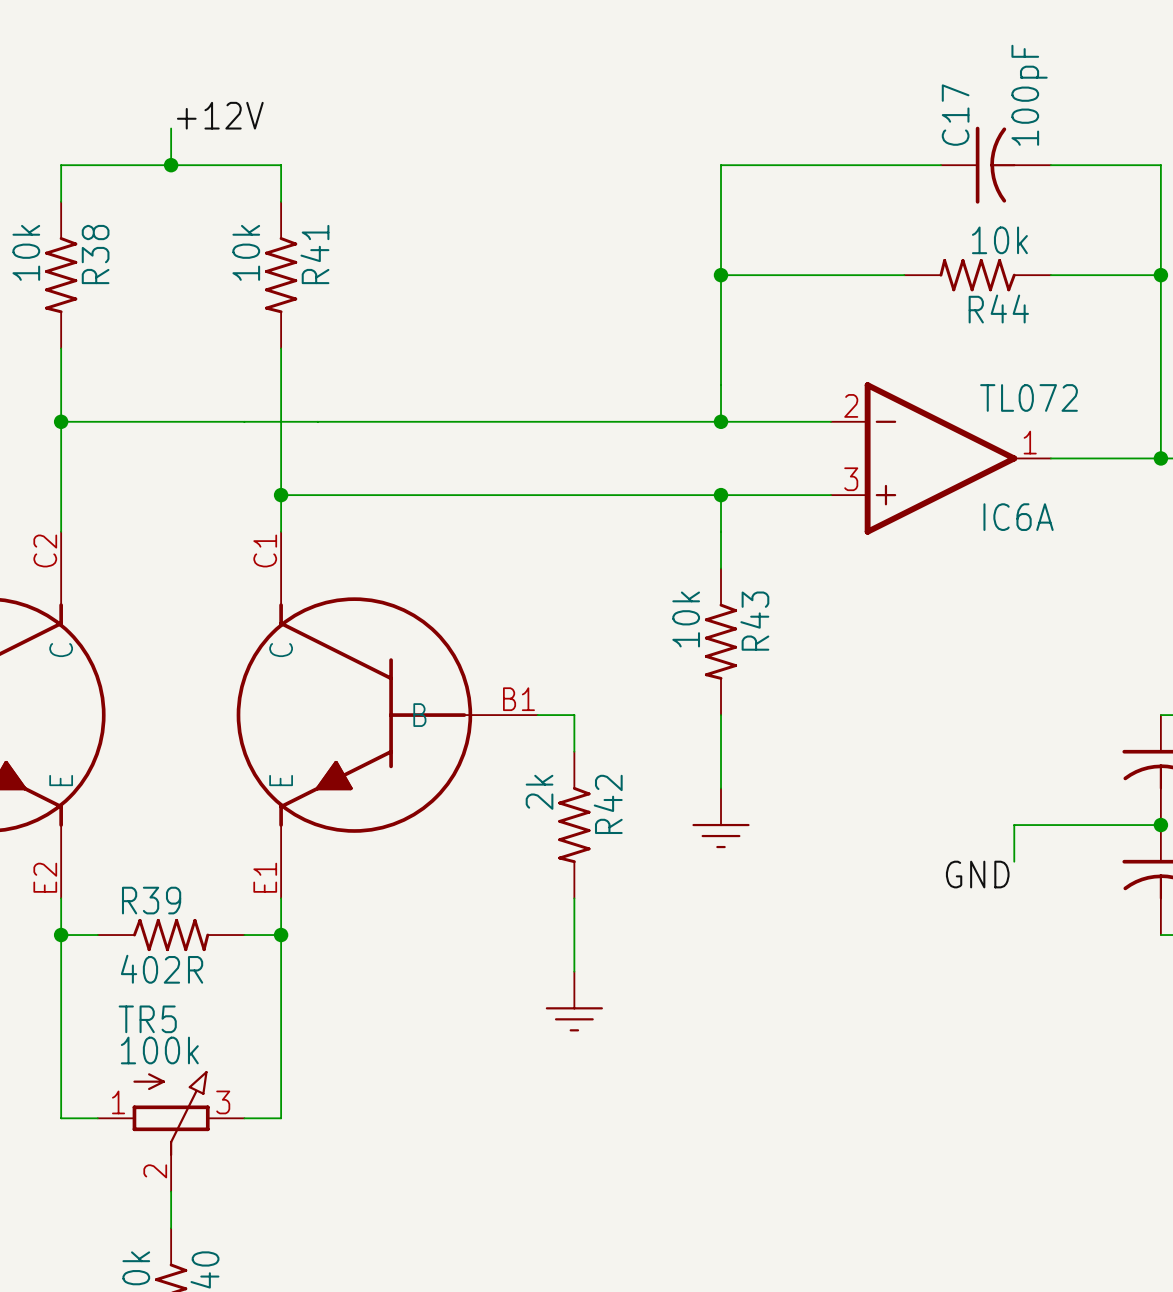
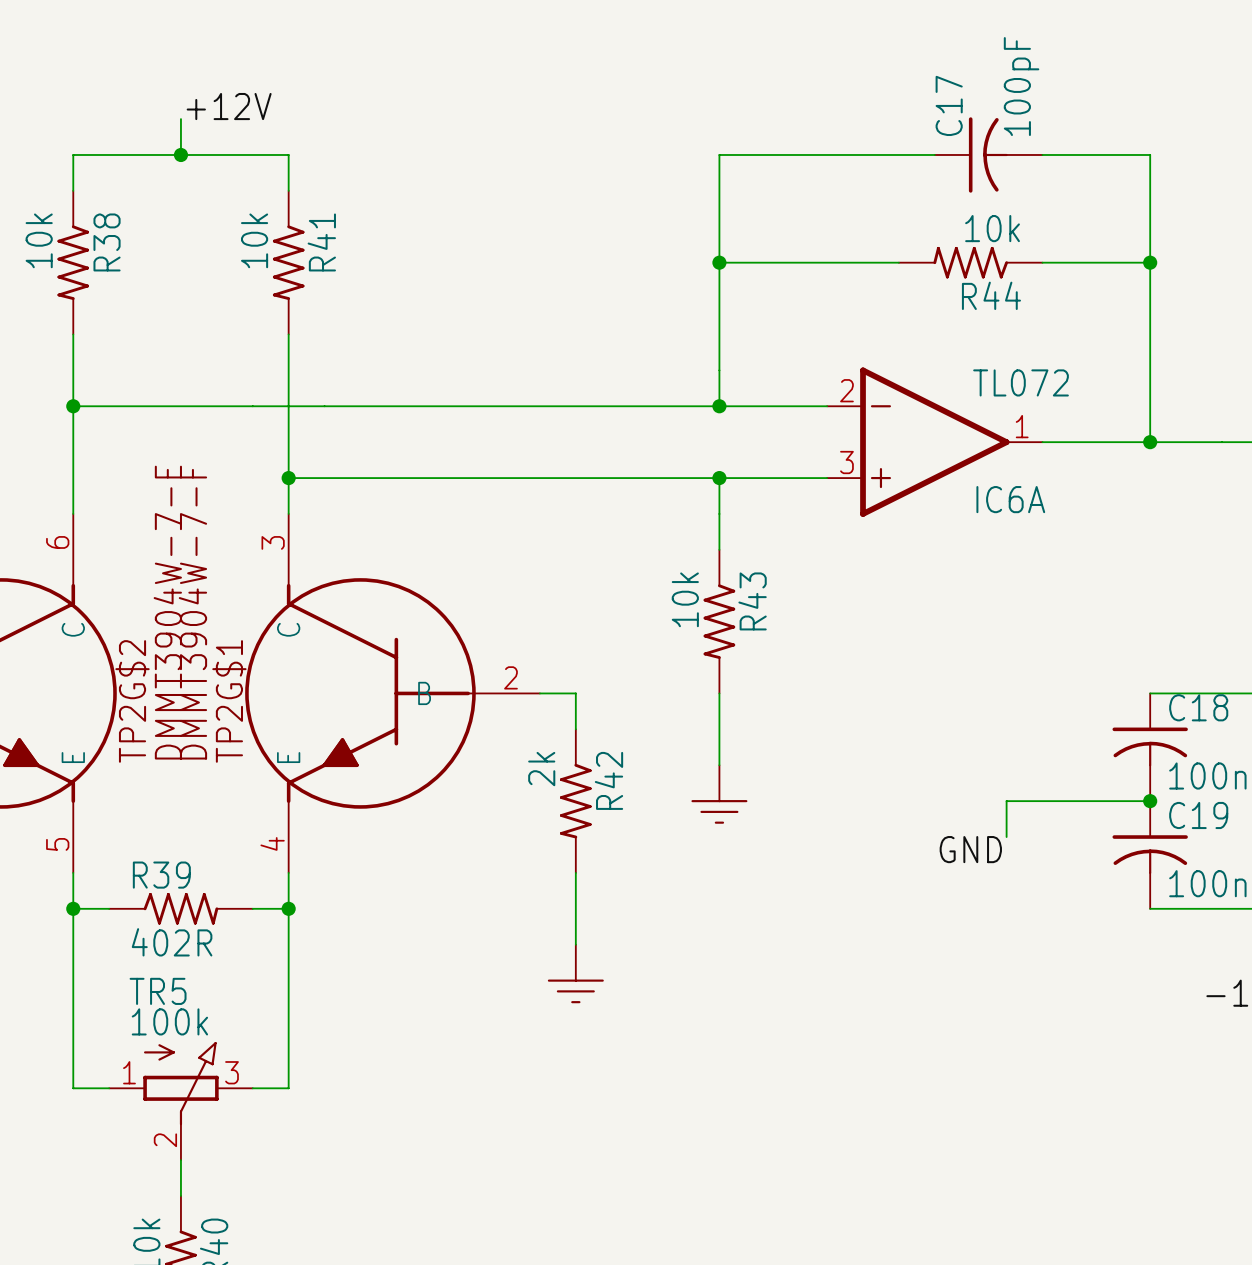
TP2G$2 pin number: C2 (45, 550) -> 6 (57, 542)
TP2G$1 pin number: C1 (265, 550) -> 3 (273, 542)
TP2G$2 value: none -> DMMT3904W-7-F (167, 612)
TP2G$1 value: none -> DMMT3904W-7-F (192, 612)
TP2G$1 pin number: B1 (518, 699) -> 2 (510, 677)
TP2G$2 name: none -> TP2G$2 (132, 701)
TP2G$1 name: none -> TP2G$1 (229, 701)
TP2G$2 pin number: E2 (45, 877) -> 5 (57, 844)
TP2G$1 pin number: E1 (265, 877) -> 4 (272, 843)

